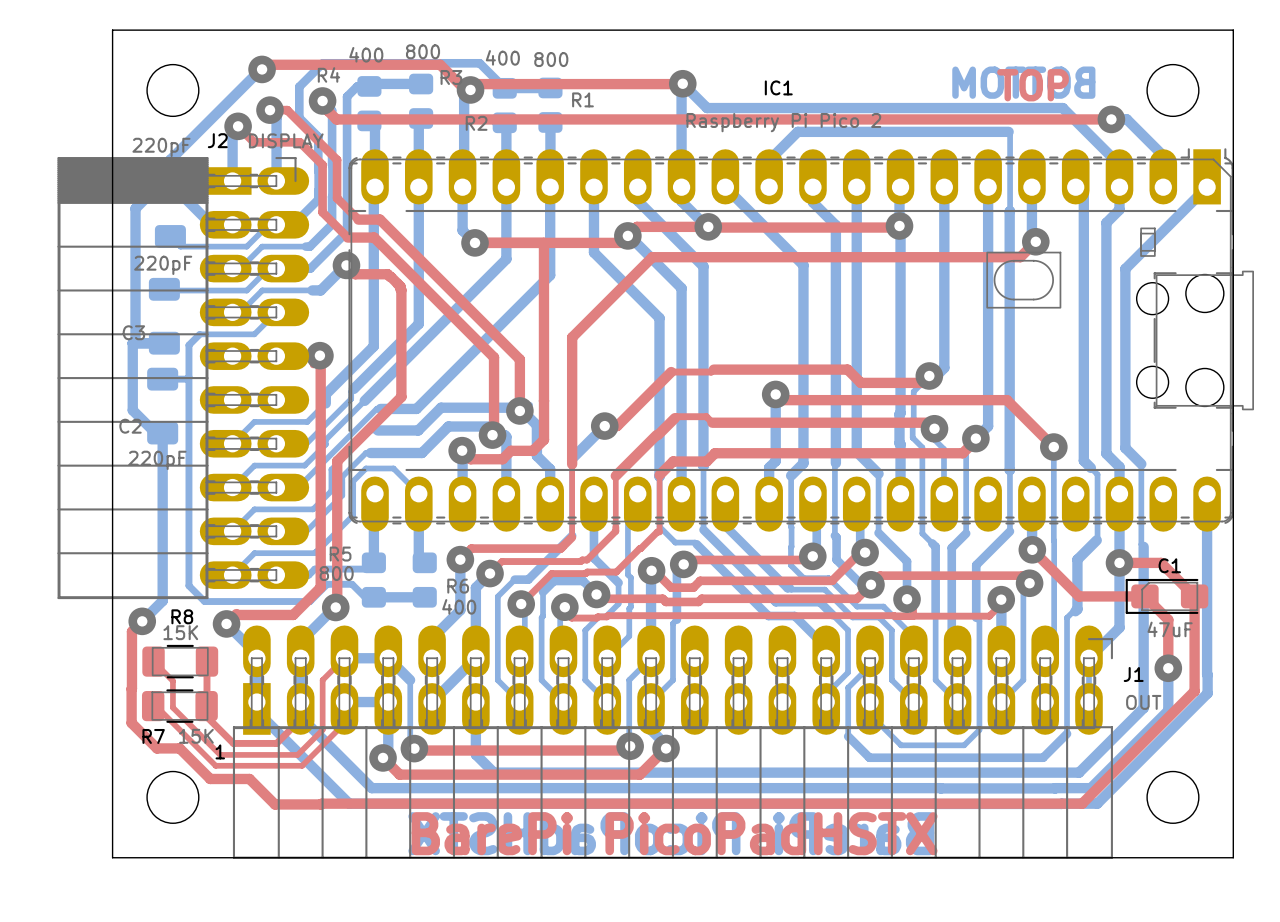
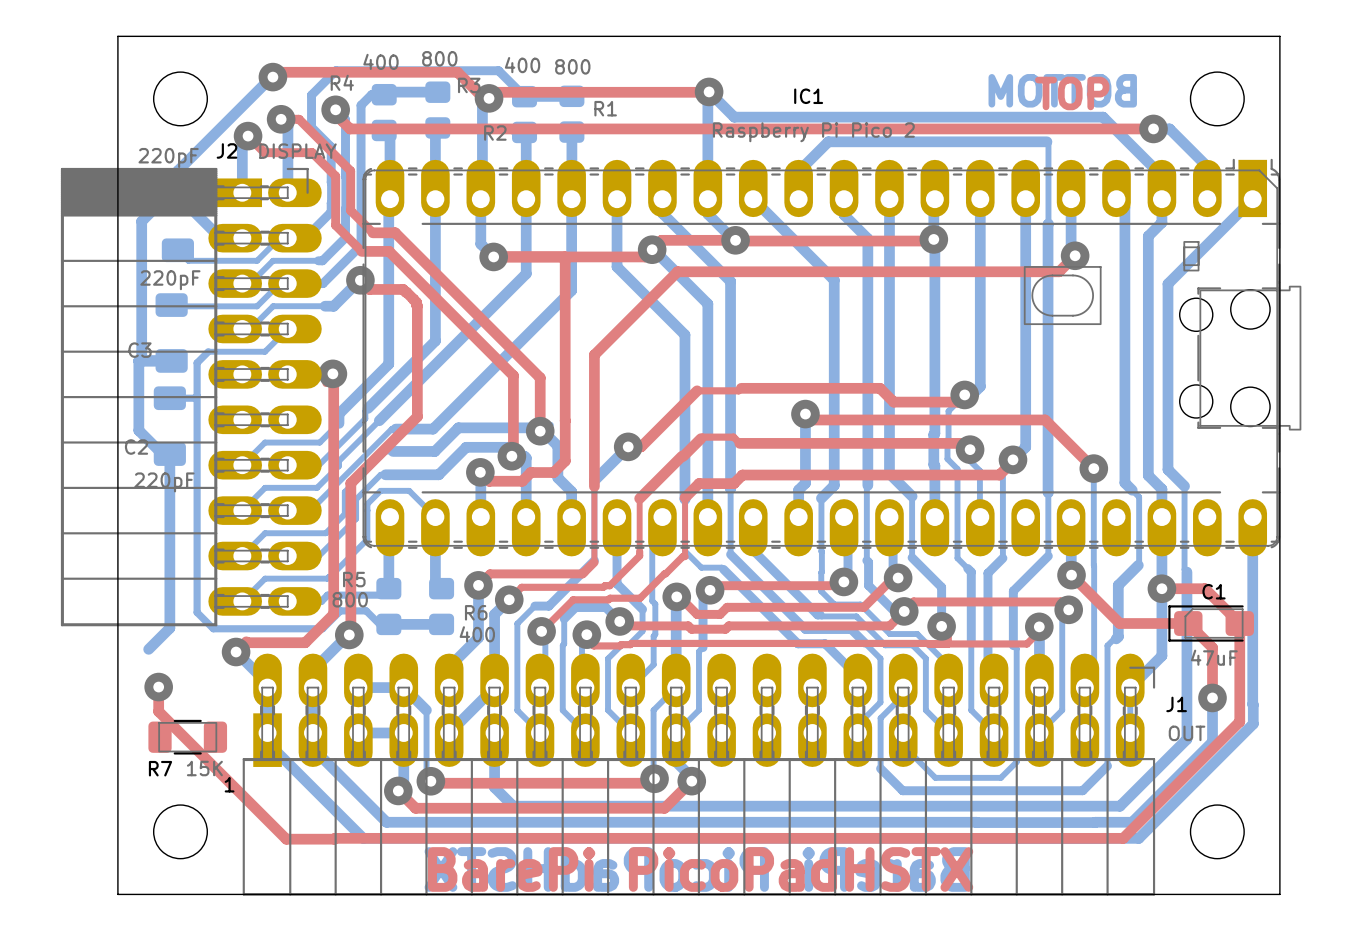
top track: (142, 621) (131, 631) (131, 723) (156, 748) (179, 748) (210, 778) (249, 778) -> (158, 687) (158, 711) (259, 812)
via position: (142, 621) -> (158, 687)
top track: (344, 658) (322, 680) (322, 729) (297, 754) (220, 754) (172, 707) (172, 681) (153, 661) -> none
R8: 15K (180, 661) -> none
top track: (206, 668) (206, 716) (233, 743) (276, 743) (300, 719) (300, 702) -> none
top track: (344, 702) (344, 723) (302, 765) (215, 765) (156, 706) (153, 706) -> none

